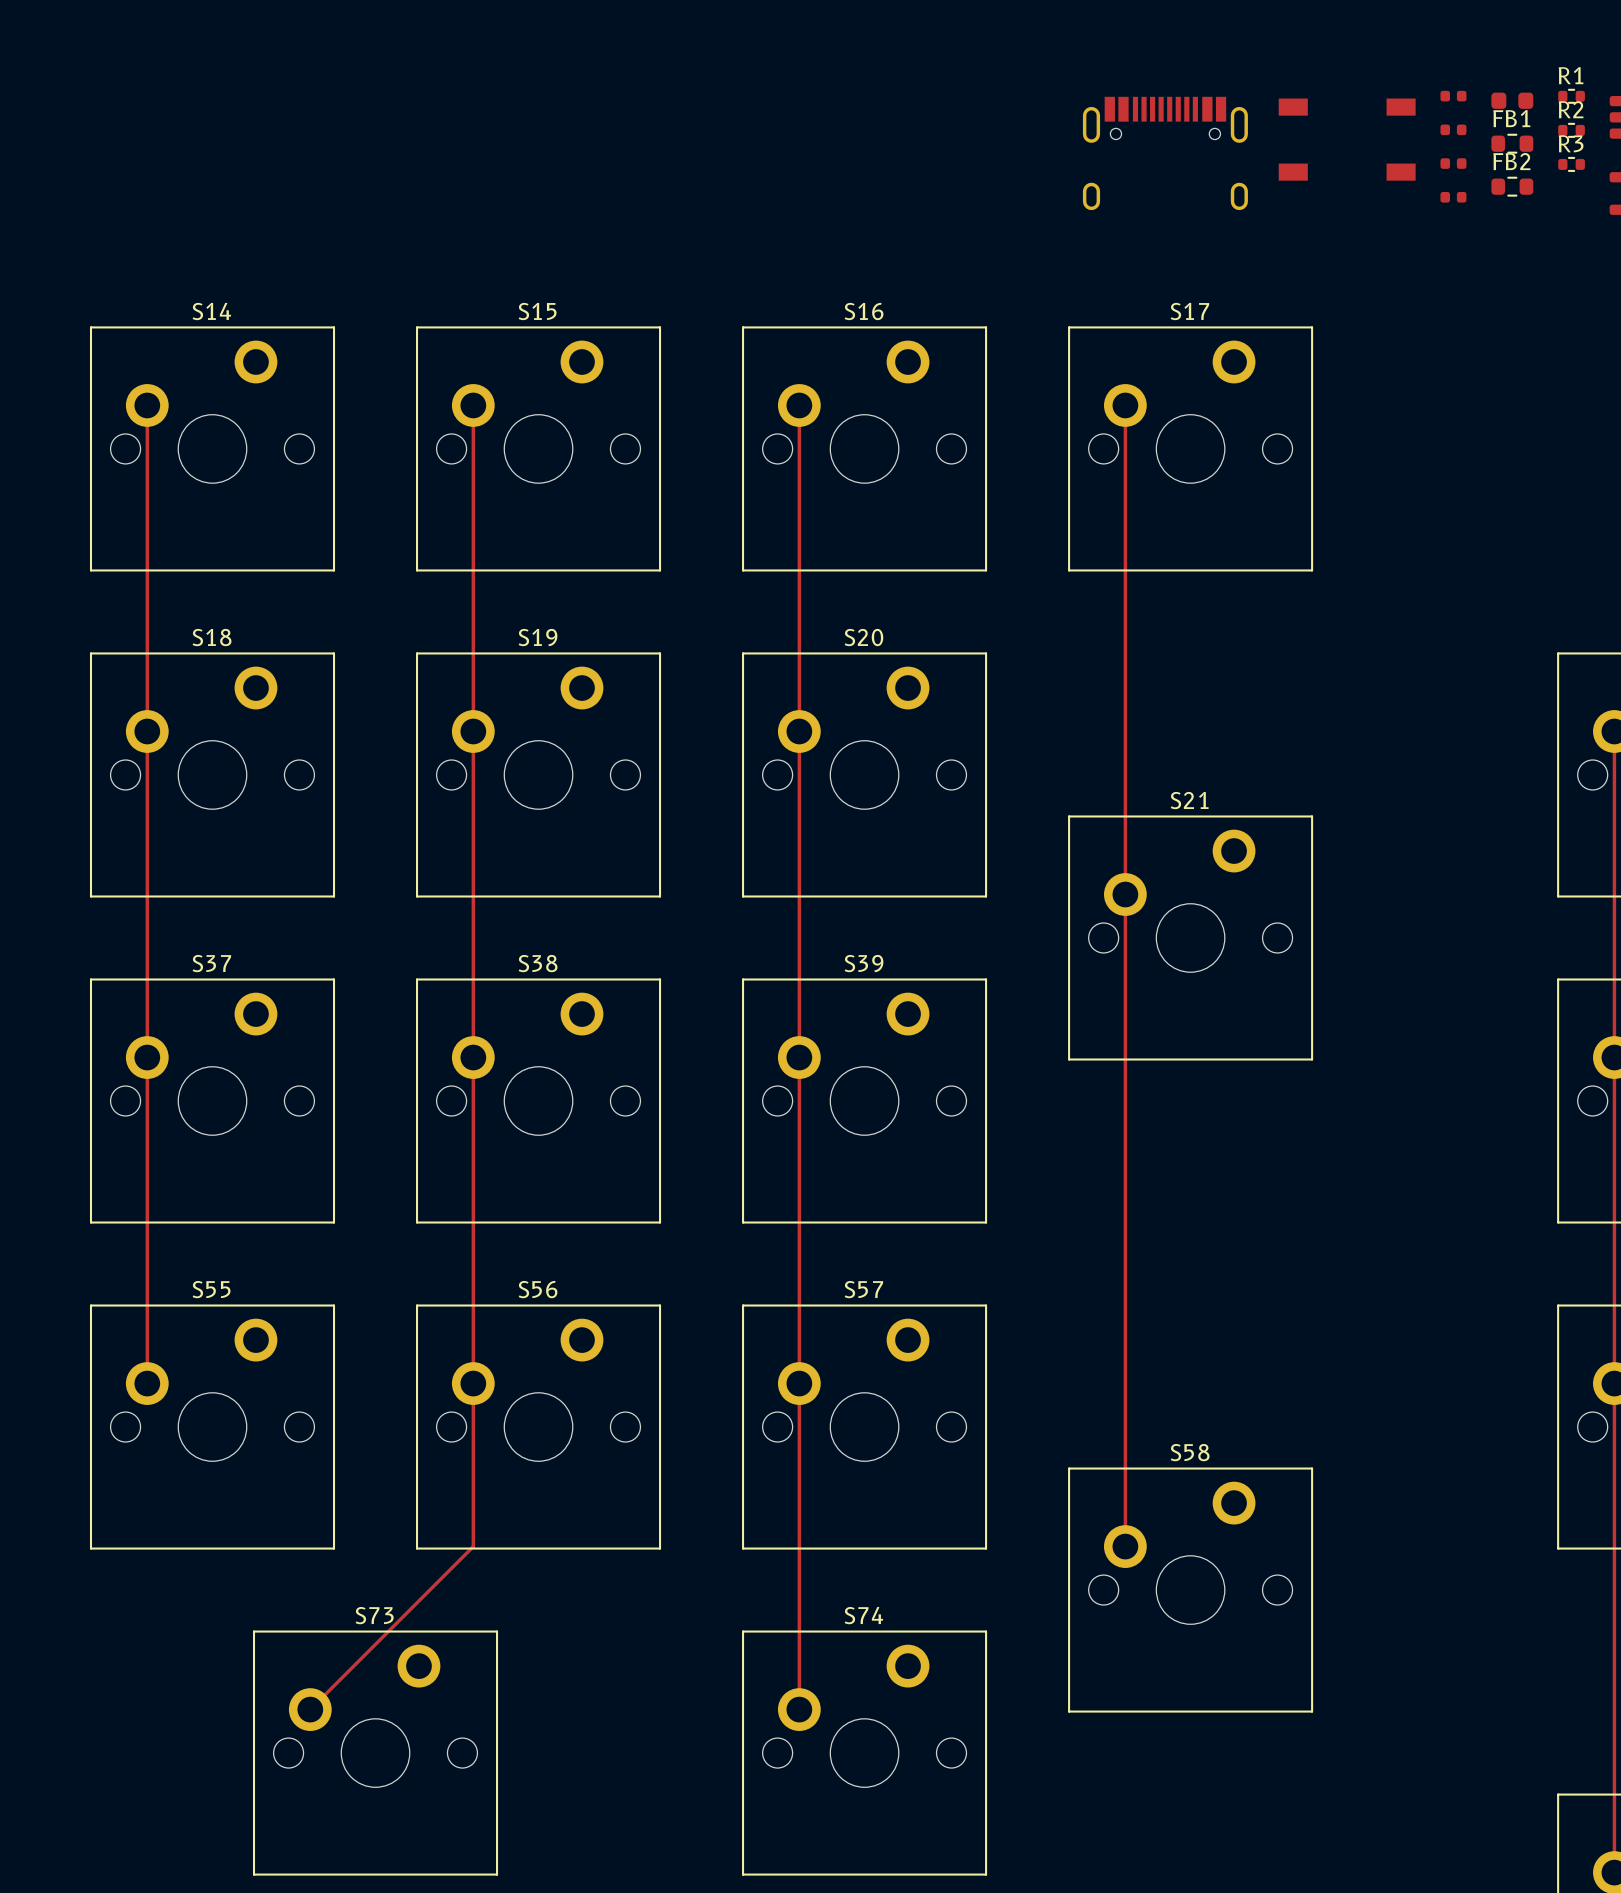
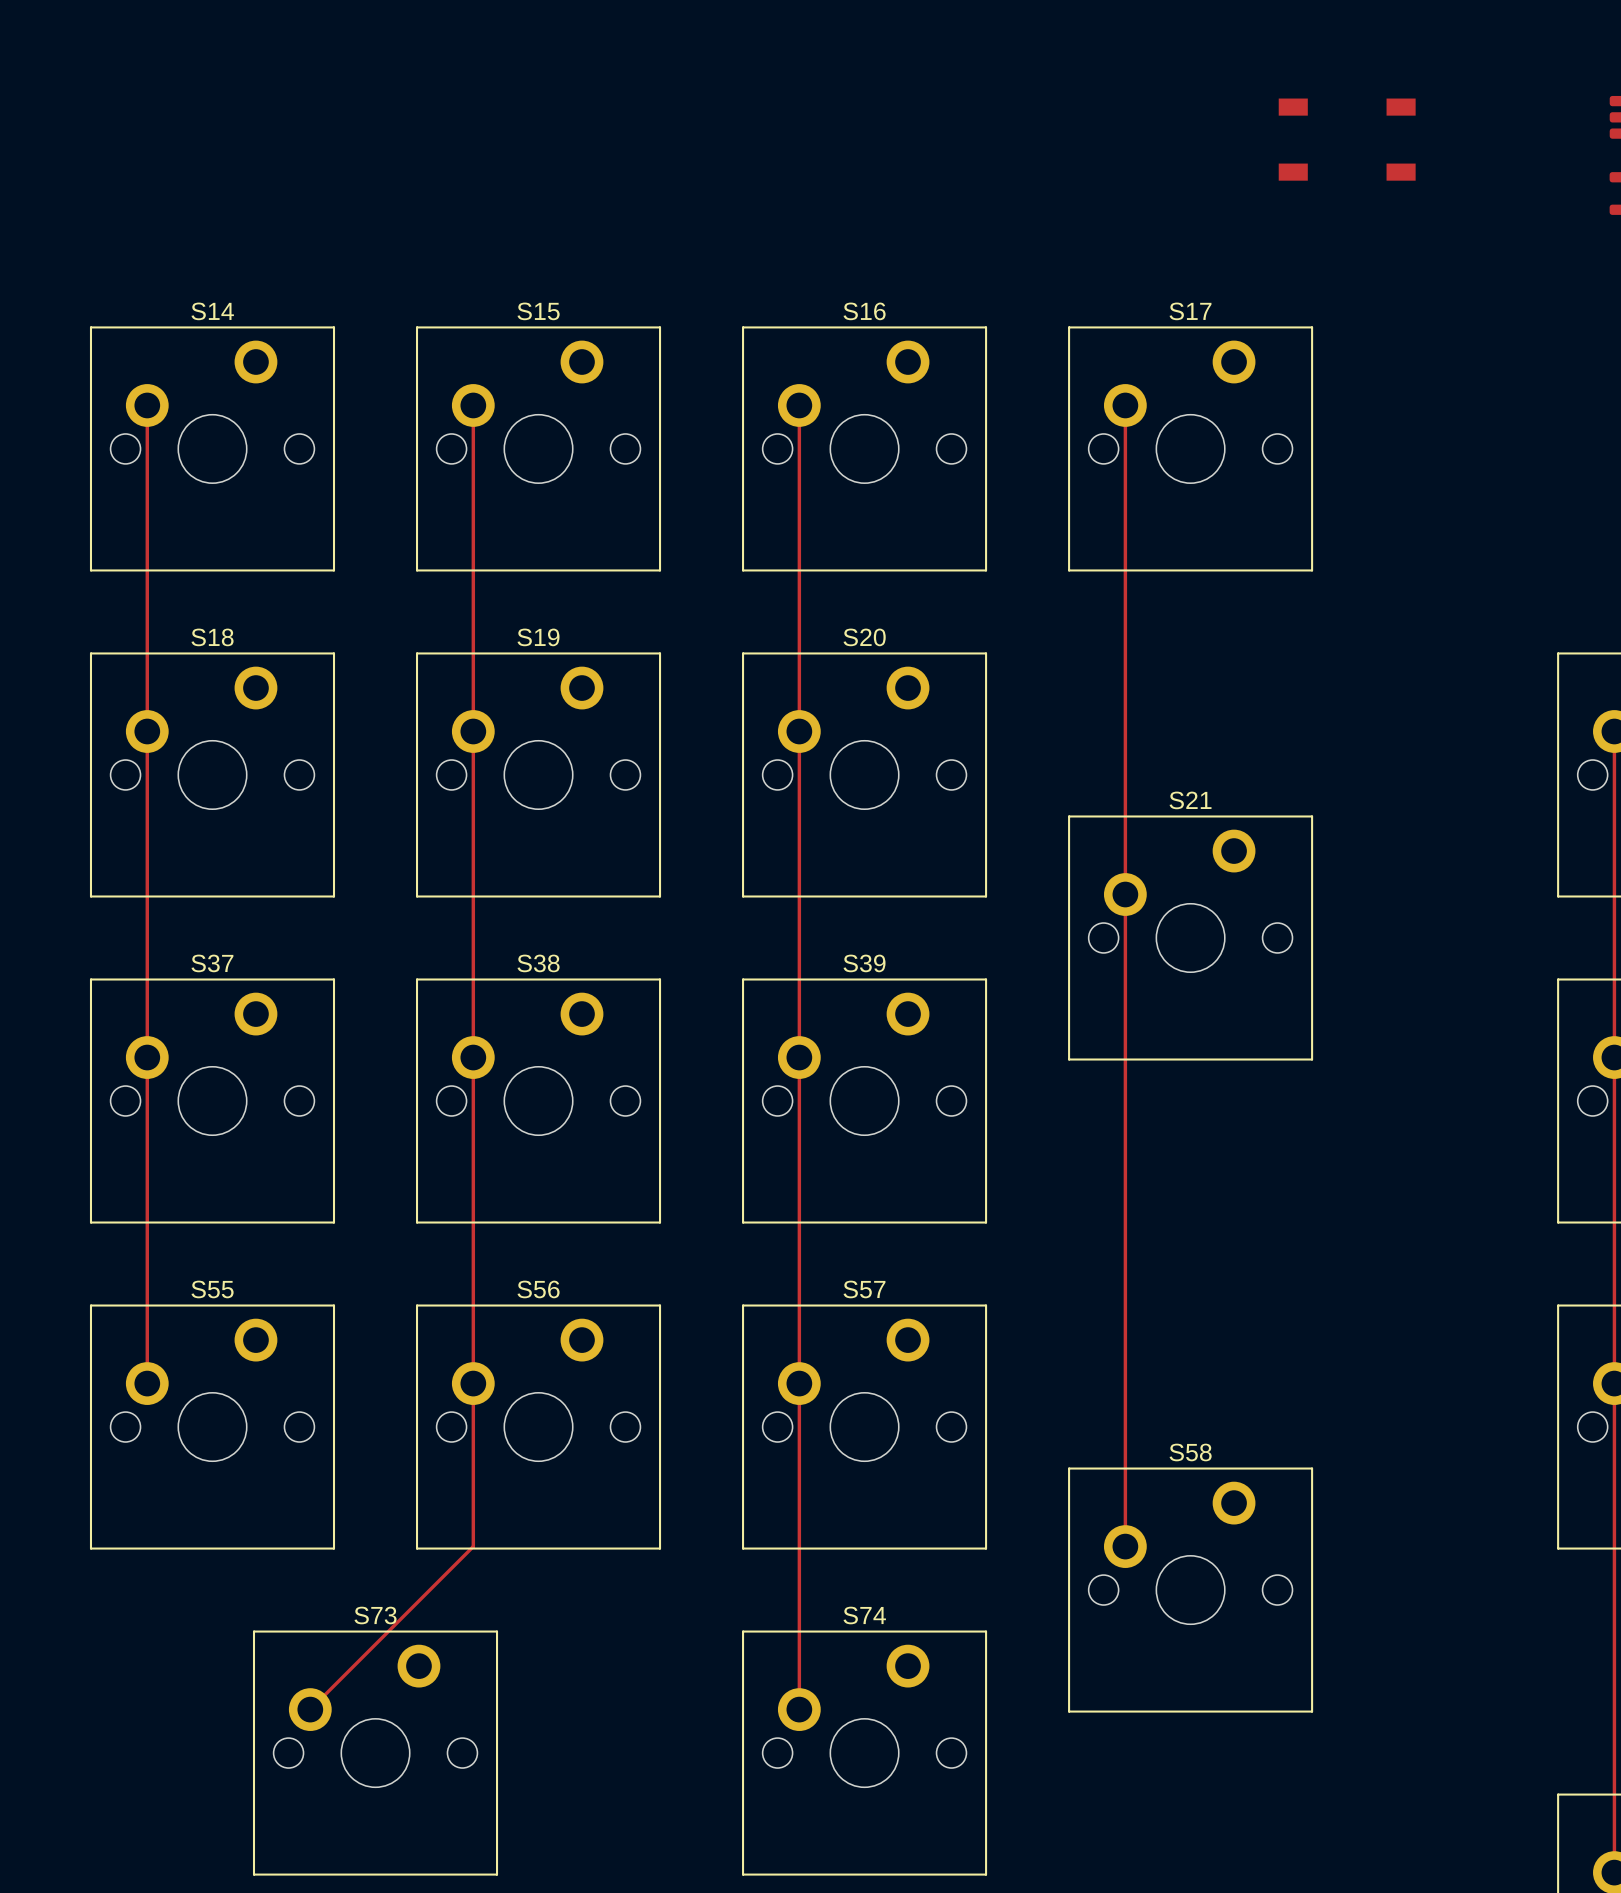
part: (1453, 96) -> none
R1: (1571, 96) -> none
part: (1512, 100) -> none
part: (1453, 129) -> none
R2: (1571, 130) -> none
FB1: (1512, 143) -> none
part: (1165, 153) -> none
part: (1453, 163) -> none
R3: (1571, 164) -> none
FB2: (1512, 186) -> none
part: (1453, 197) -> none

